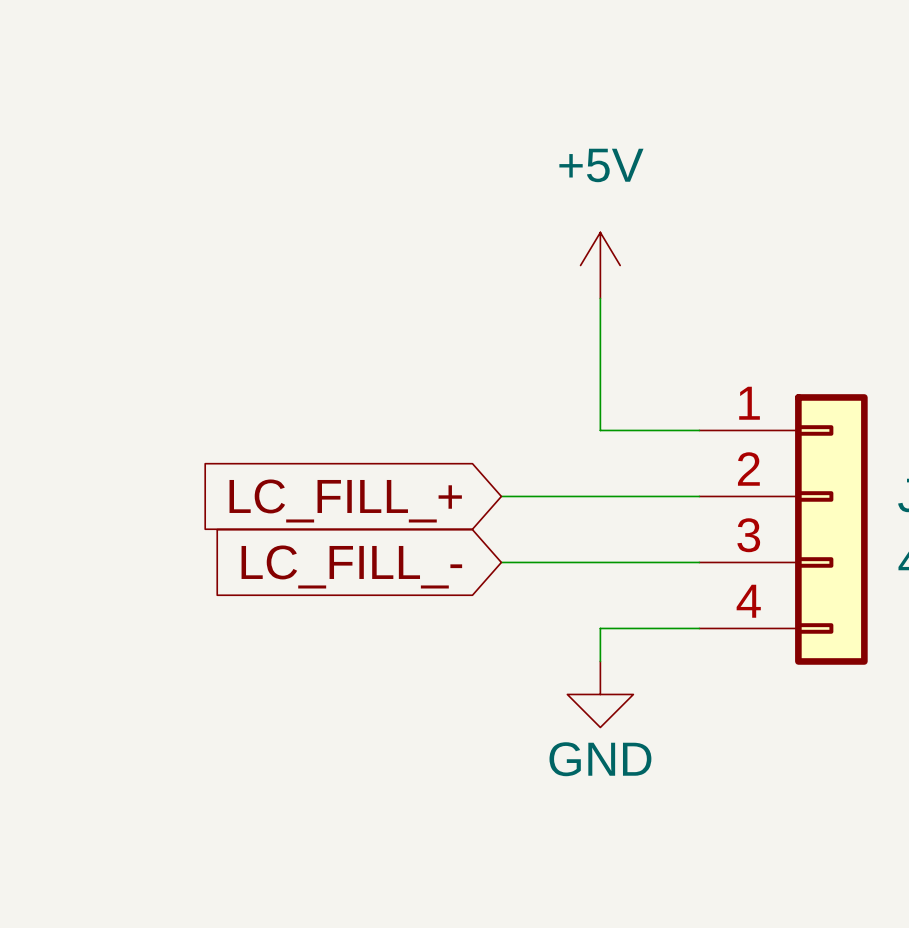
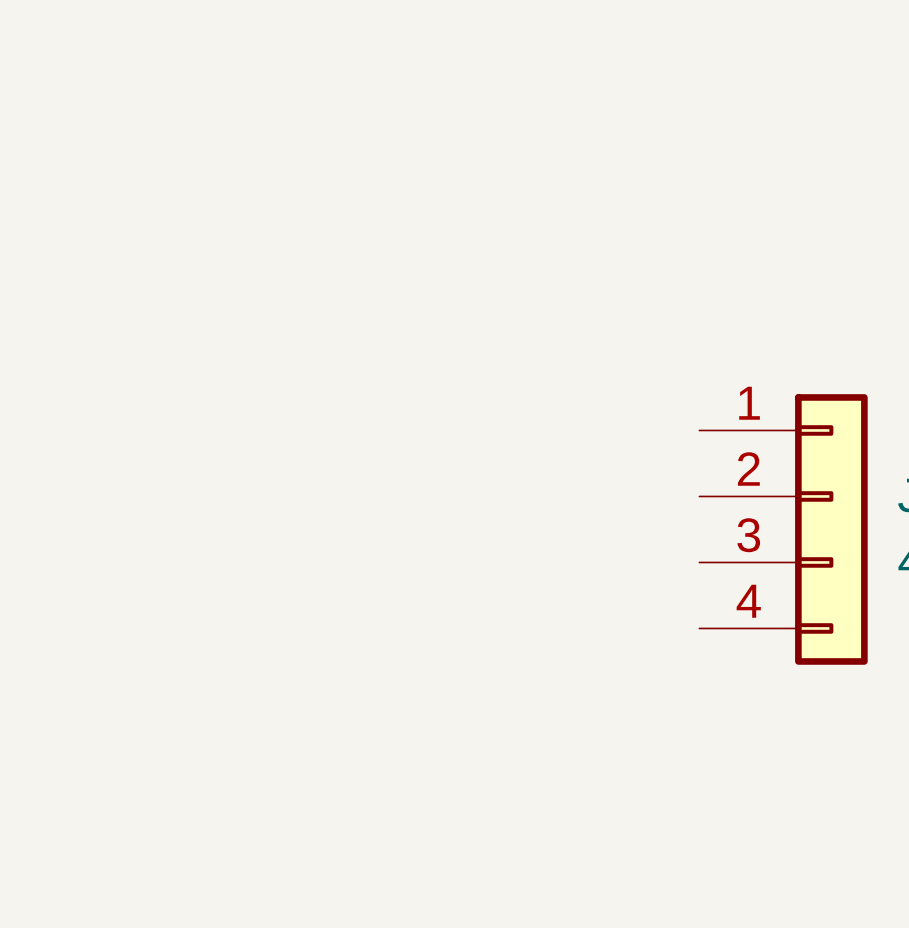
power symbol: +5V (600, 265) -> none
wire: (600, 298) (600, 430) (699, 430) -> none
wire: (501, 496) (699, 496) -> none
global label: LC_FILL_+ (345, 500) -> none
wire: (501, 562) (699, 562) -> none
global label: LC_FILL_- (351, 566) -> none
wire: (699, 628) (600, 628) (600, 661) -> none
power symbol: GND (600, 694) -> none

